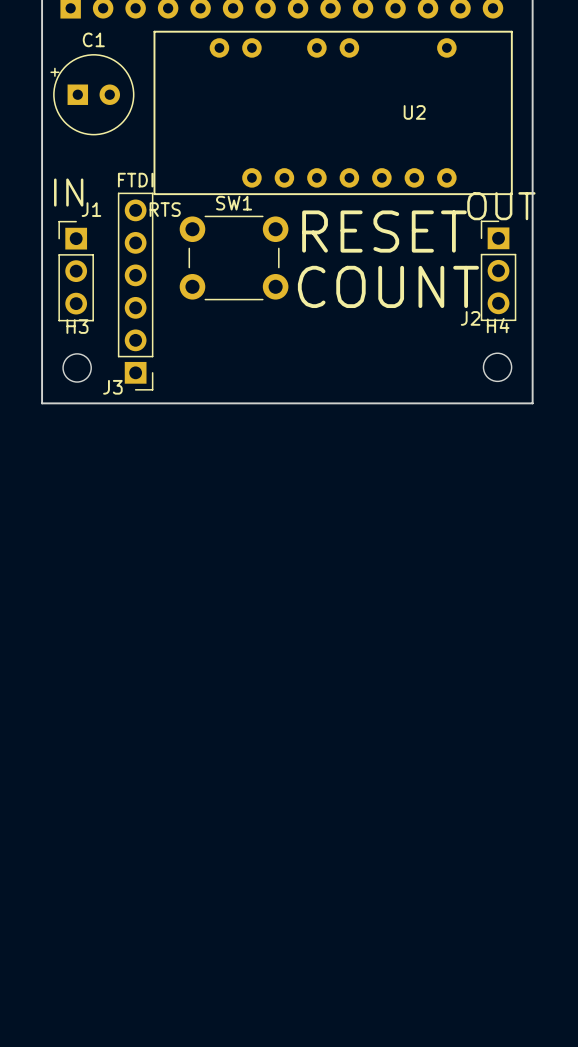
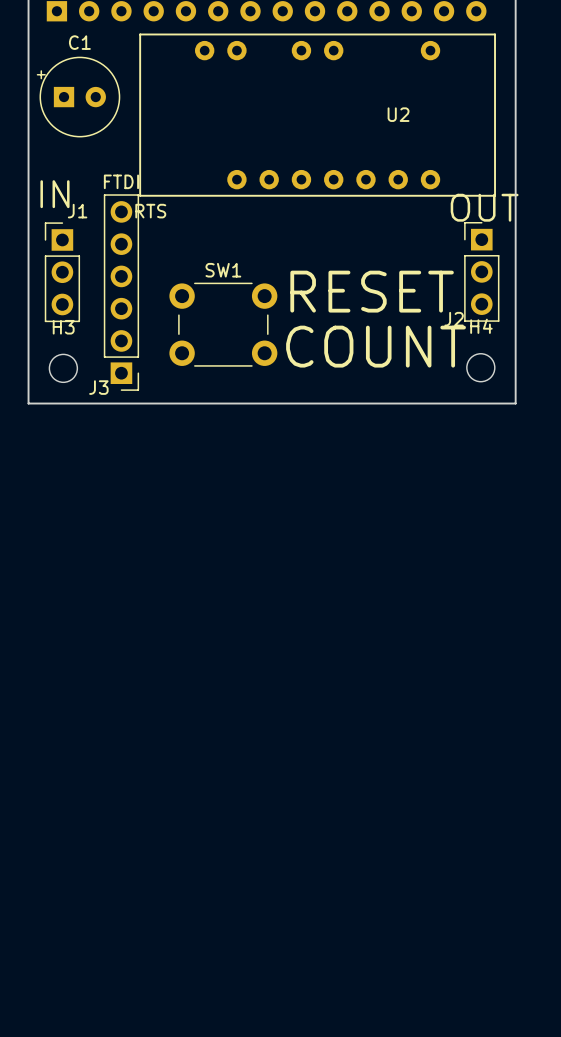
text: RESET (384, 231) -> none
SW1 position: (234, 258) -> (223, 324)
text: COUNT (388, 286) -> RESET (372, 291)
text: none -> COUNT (376, 346)

